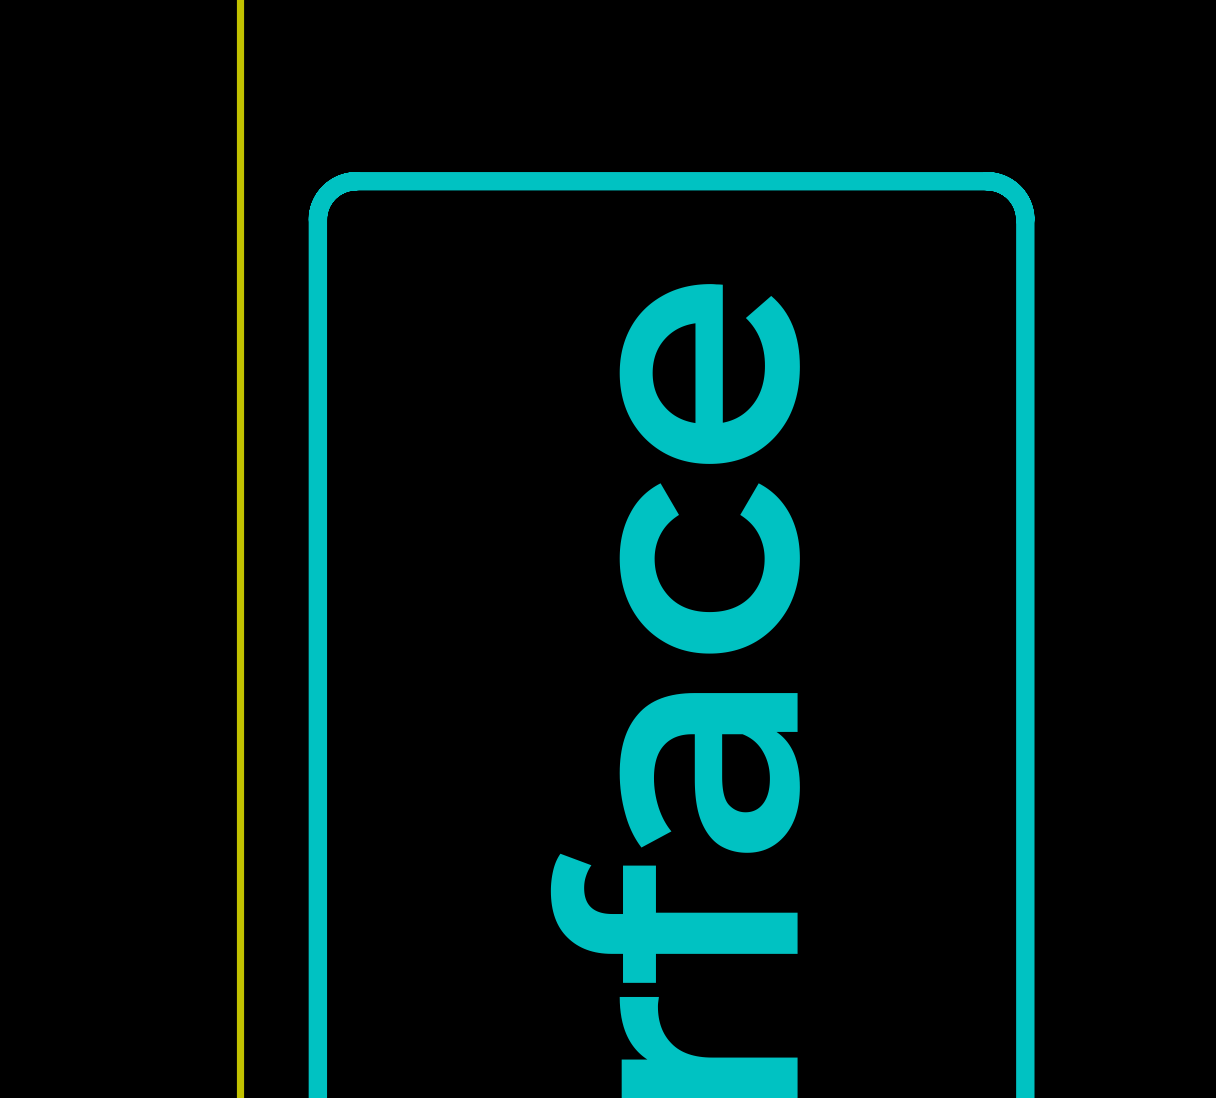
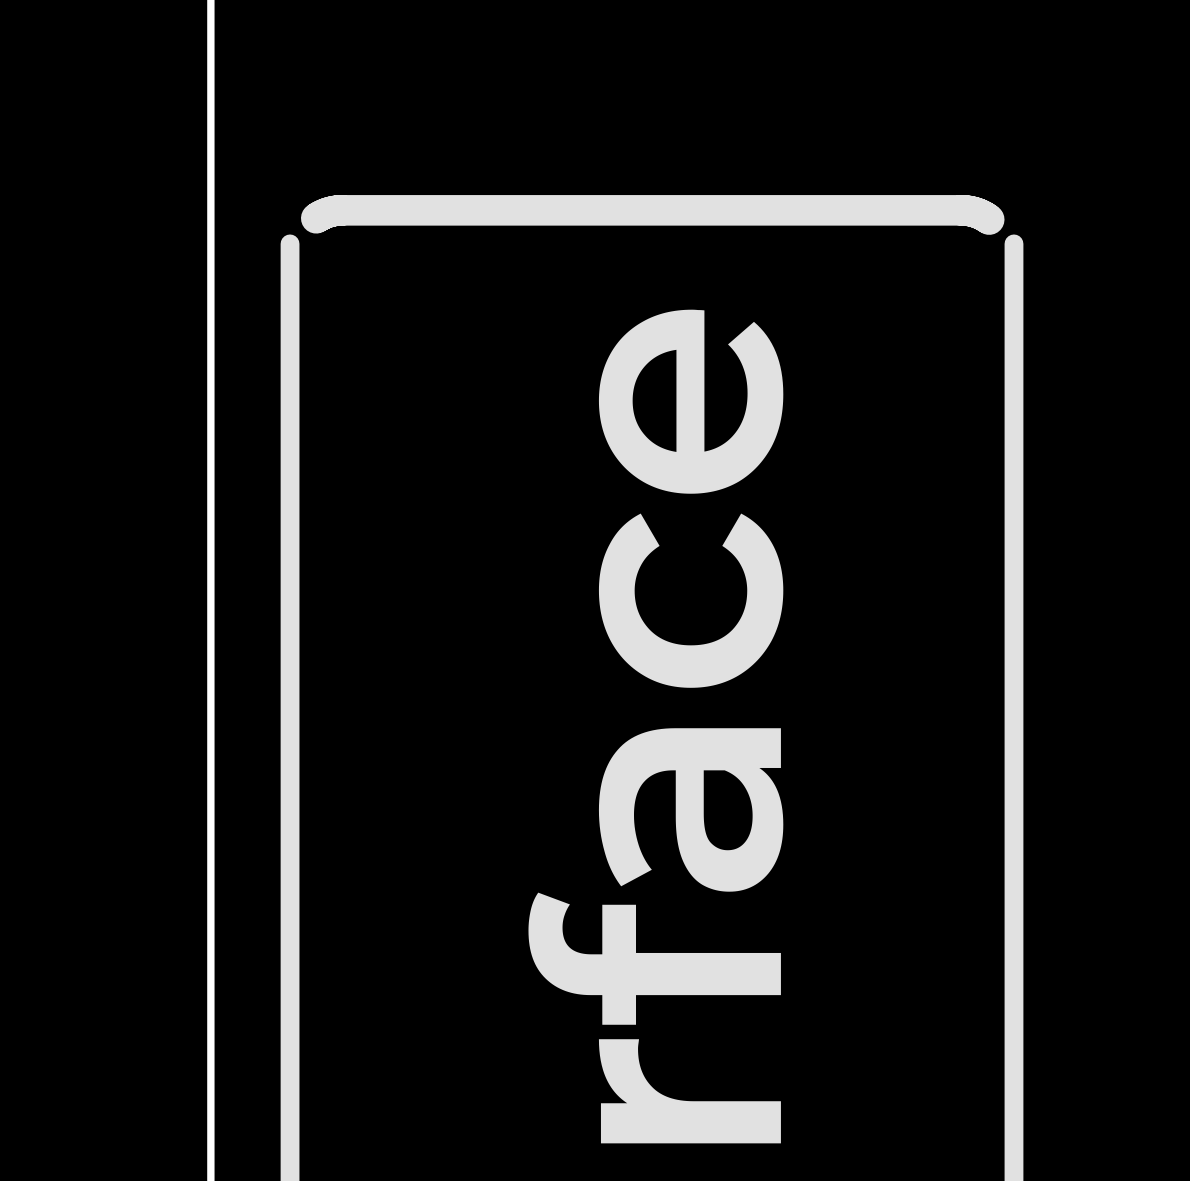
line: (356, 181) (986, 181) -> none
line: none -> (342, 210) (961, 210)

